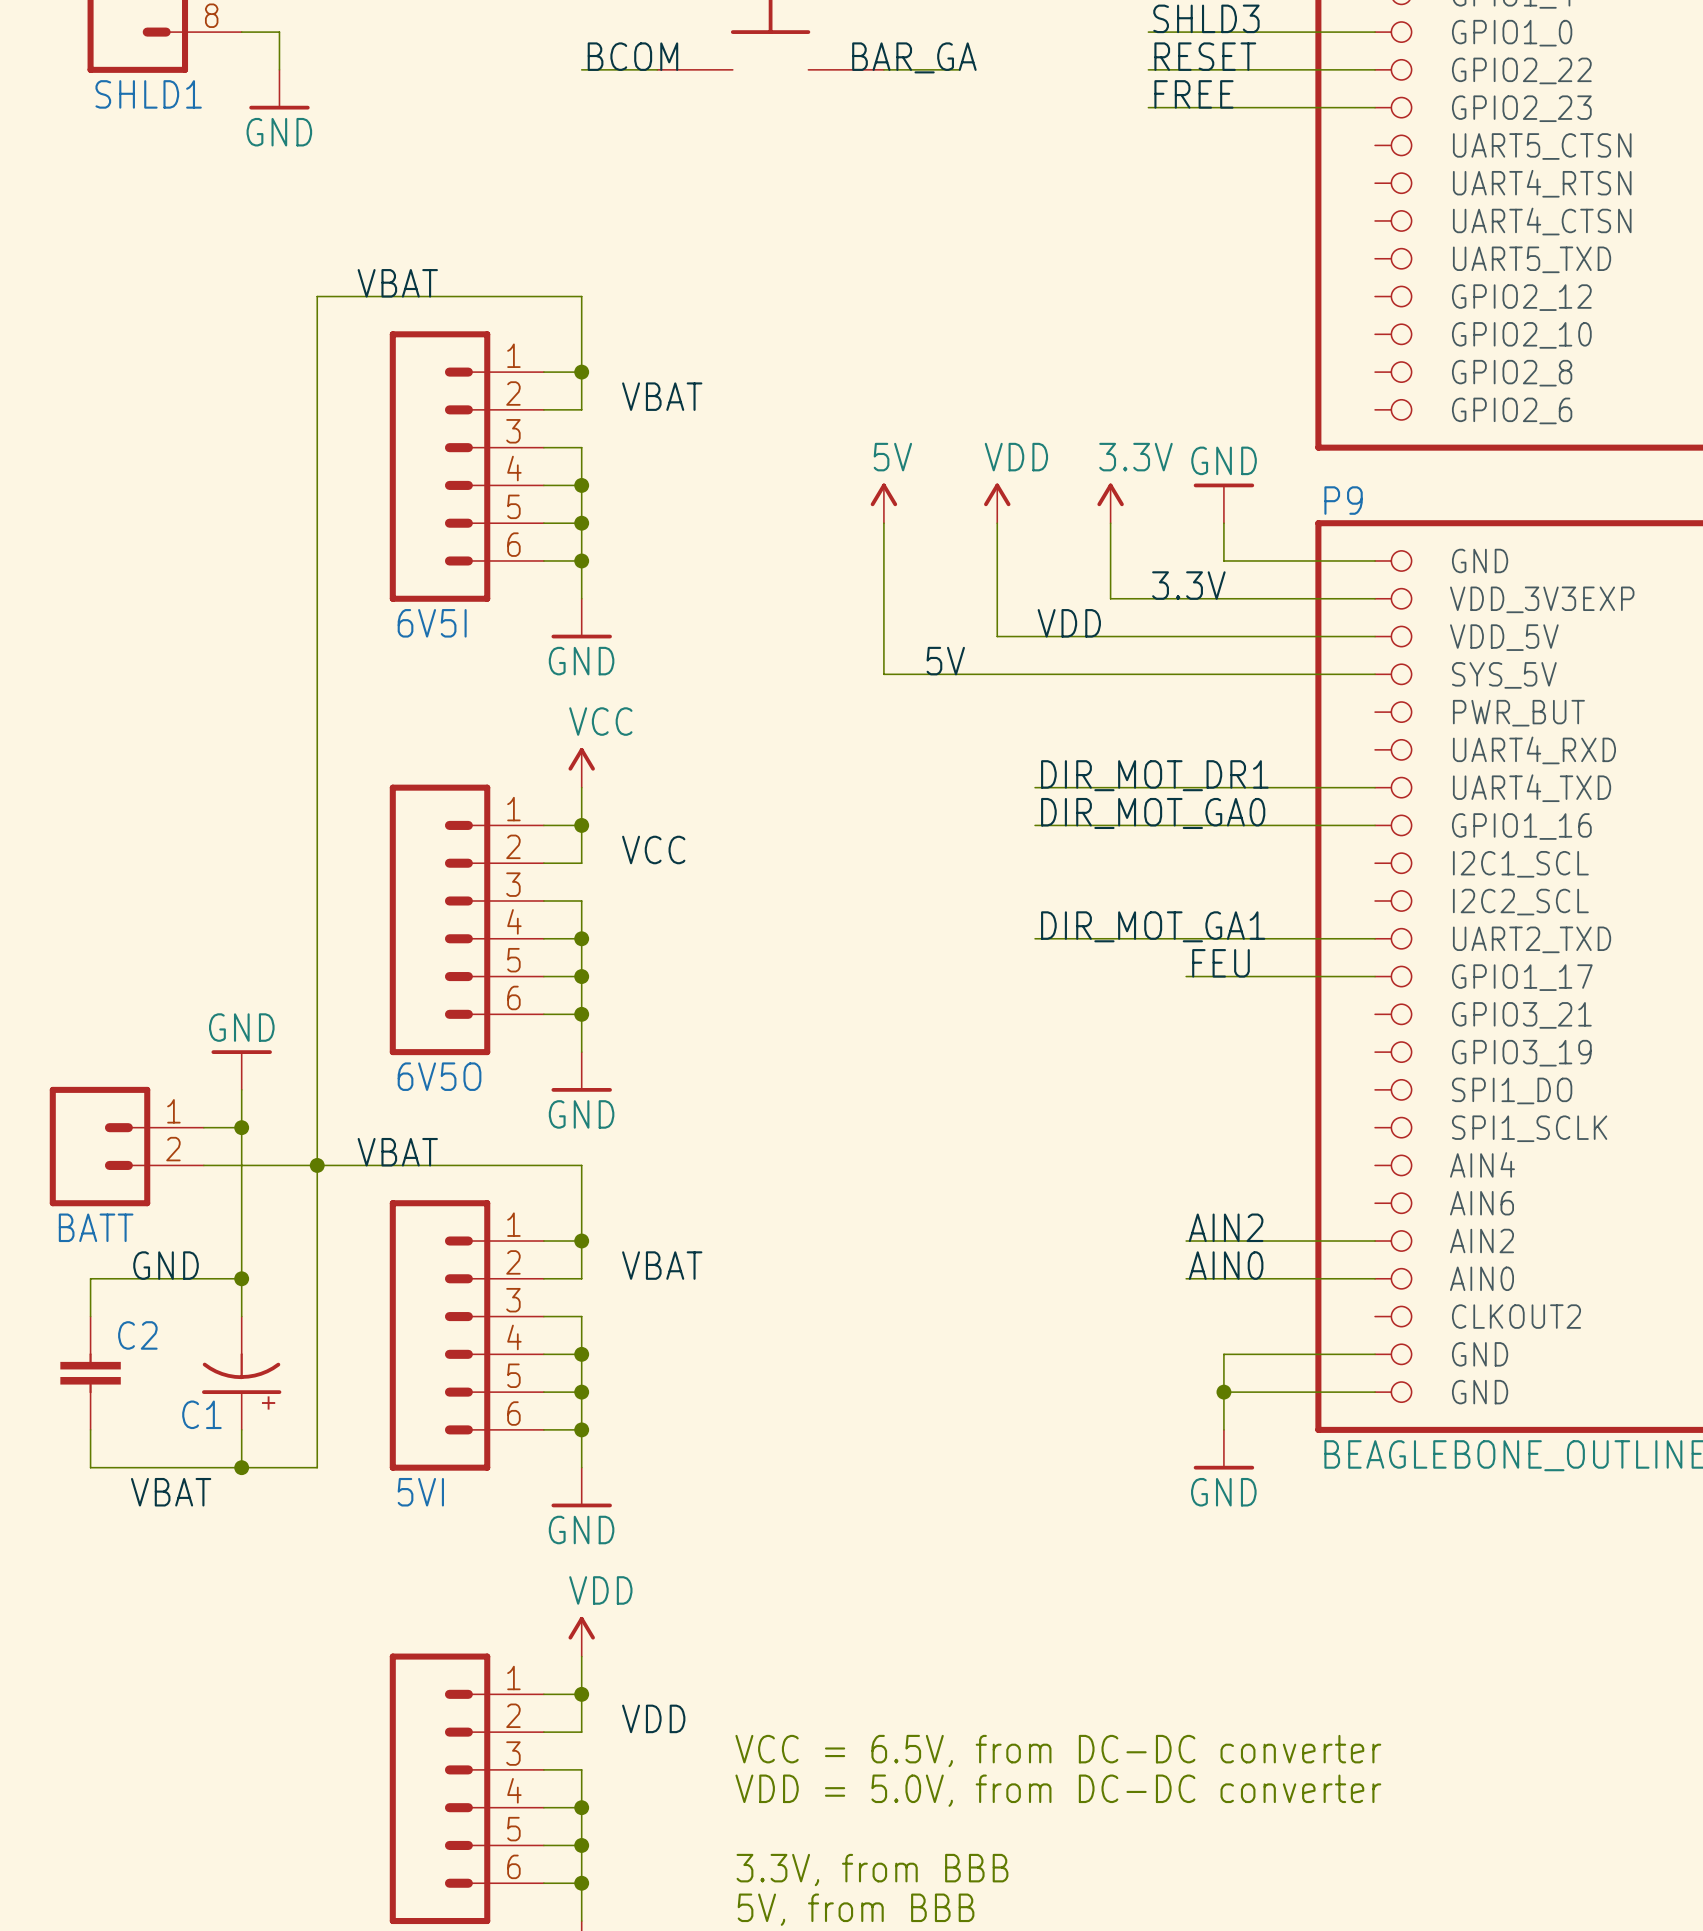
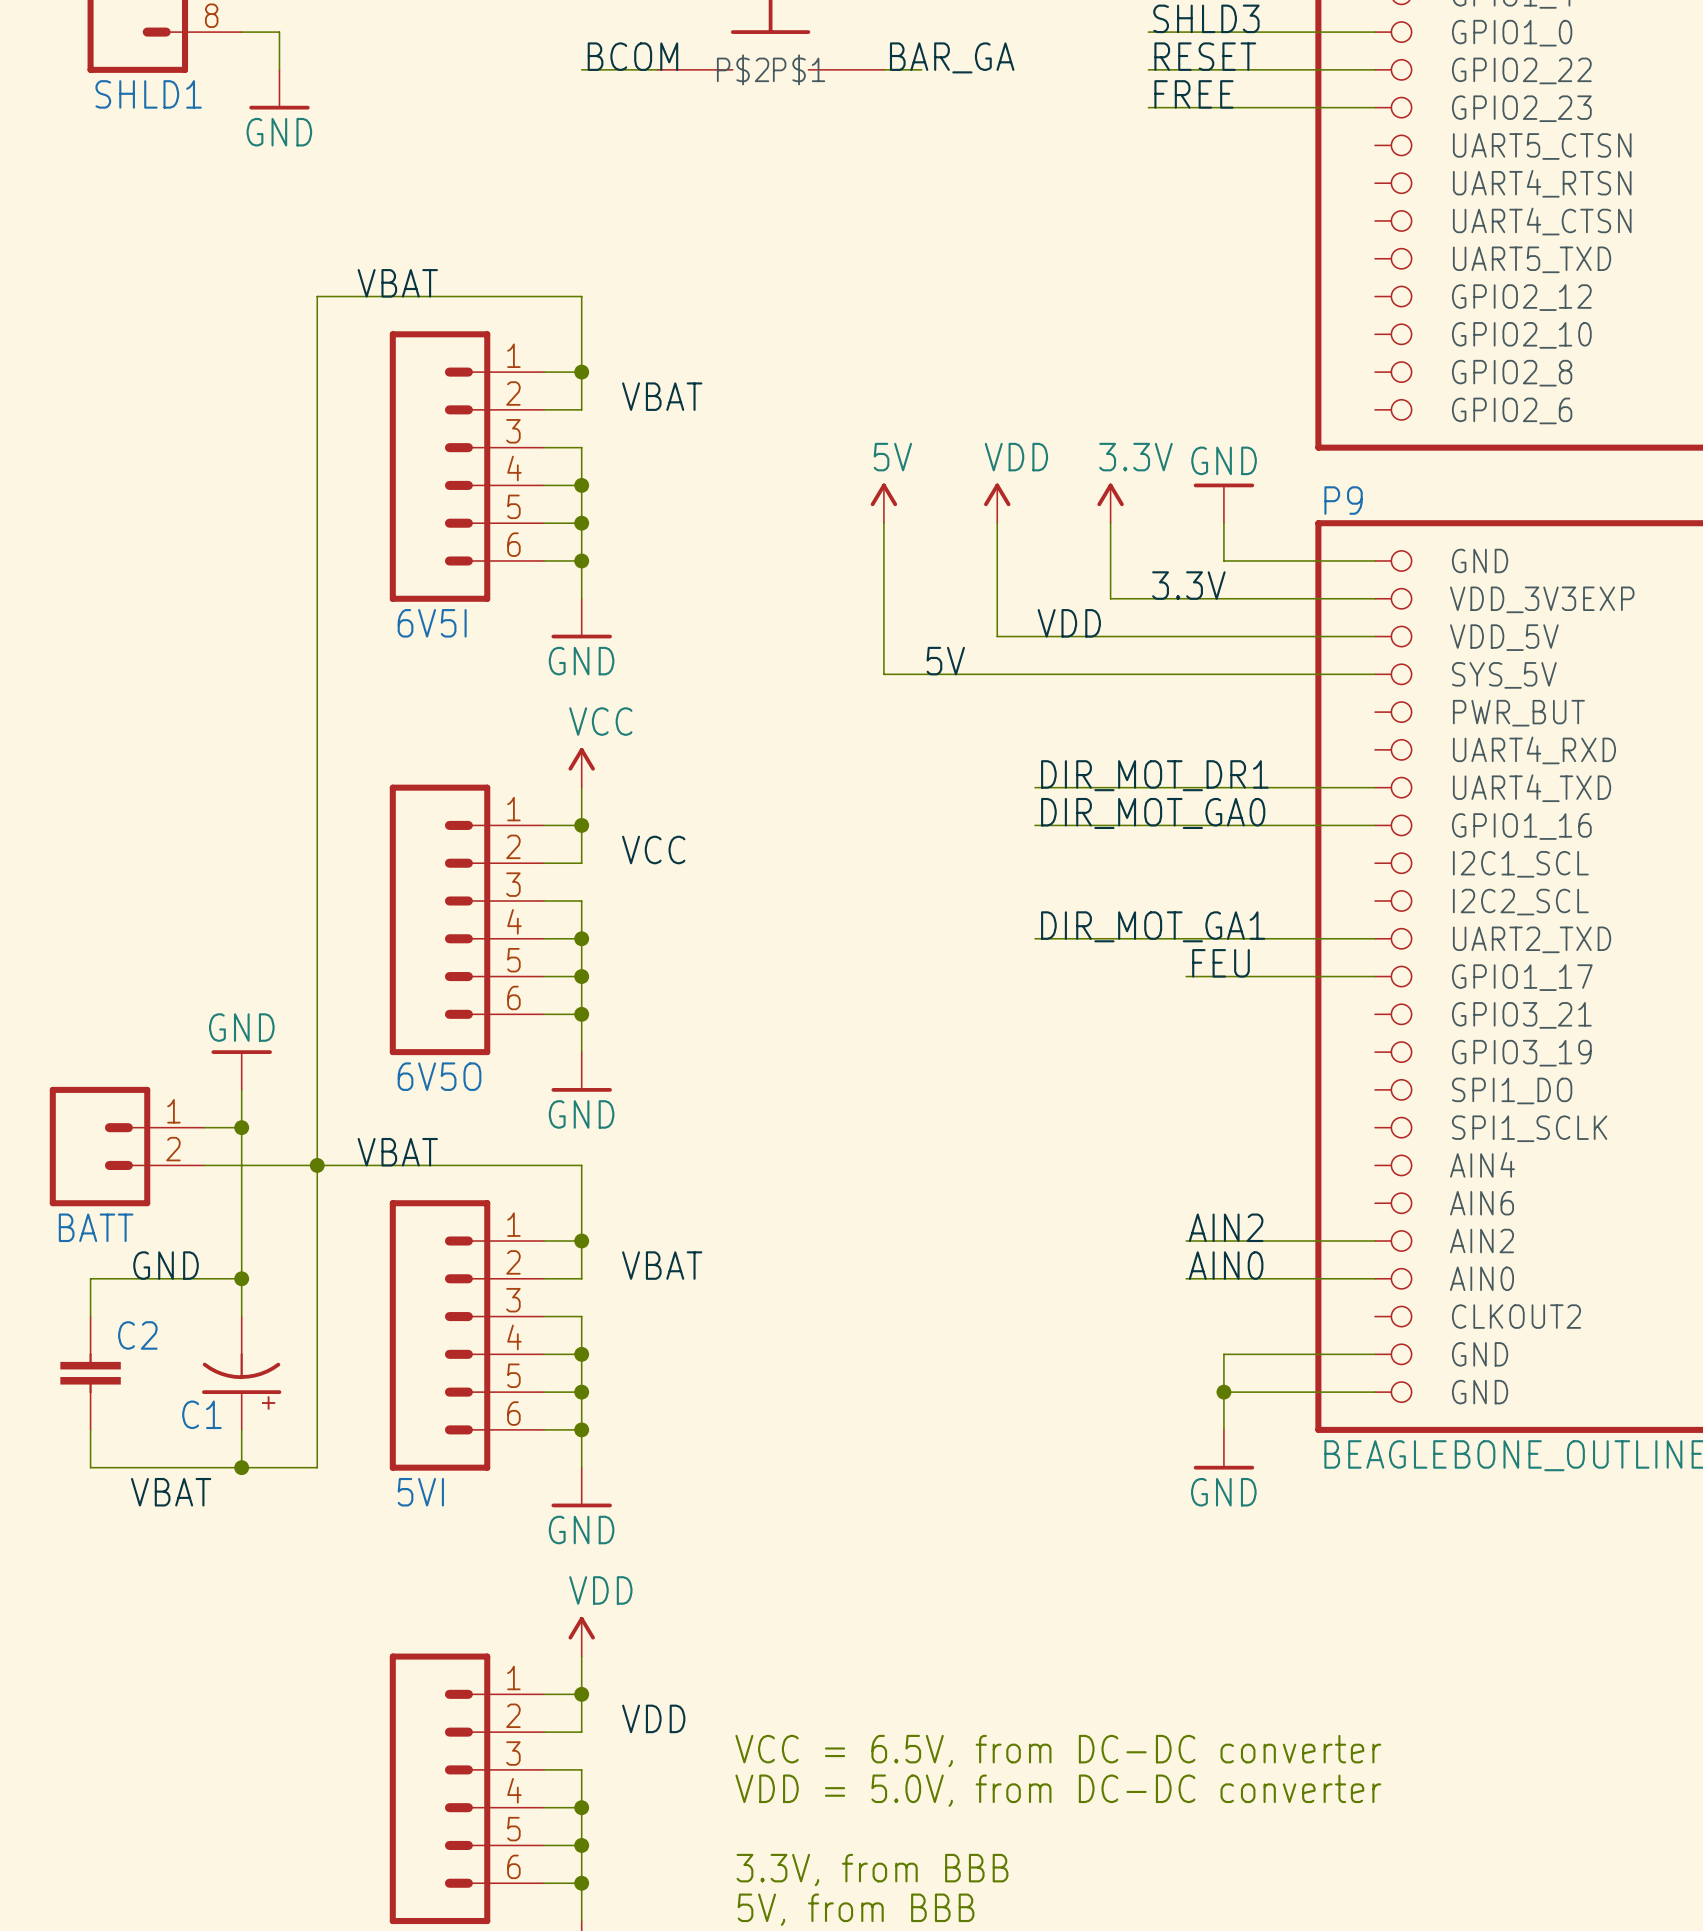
label position: BAR_GA (914, 57) -> BAR_GA (952, 57)
part pin name: none -> P$2 (743, 69)
part pin name: none -> P$1 (799, 69)
wire: (921, 69) (959, 69) -> none

